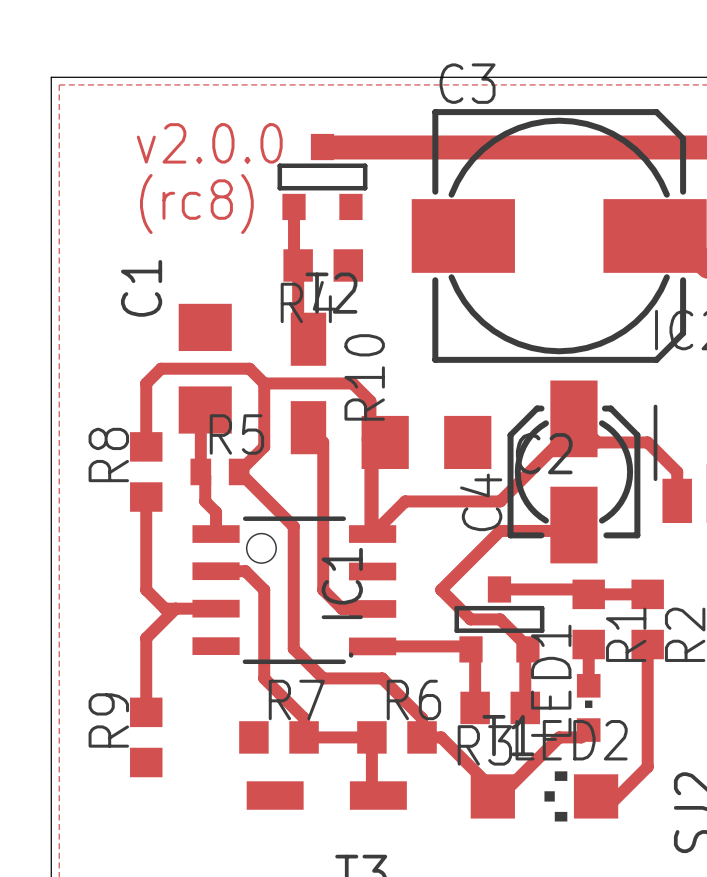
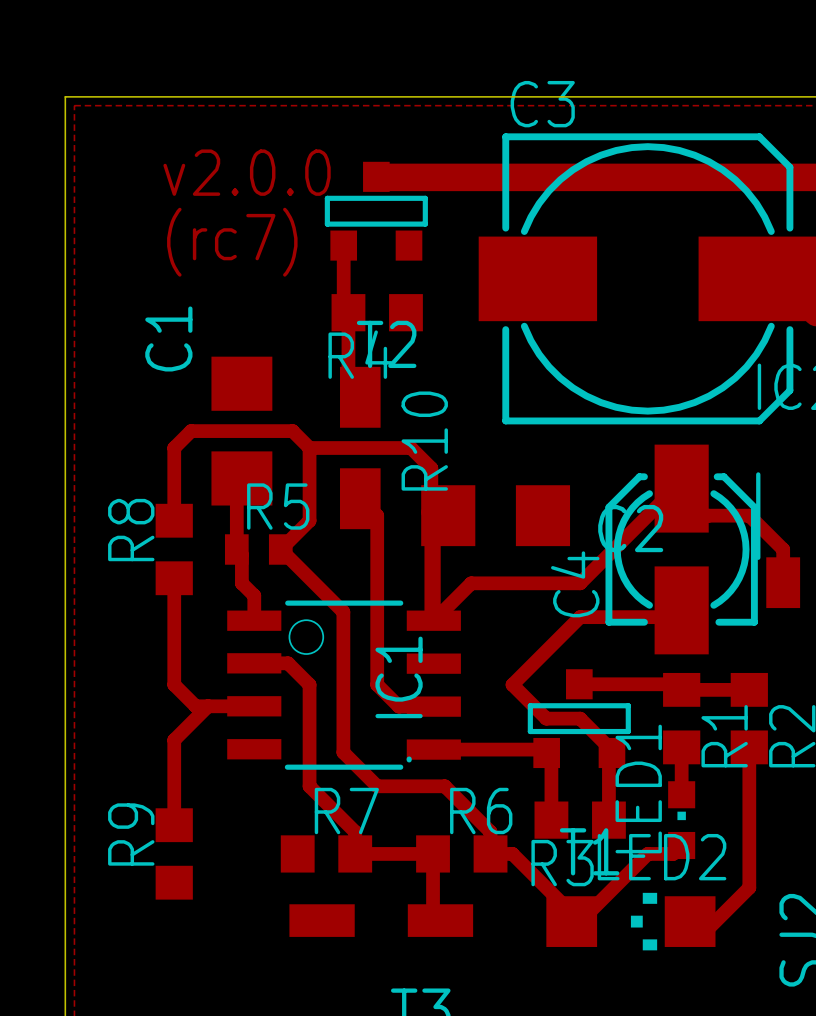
text: (rc8) (196, 204) -> (rc7) (232, 242)
C4 position: (573, 471) -> (681, 549)

